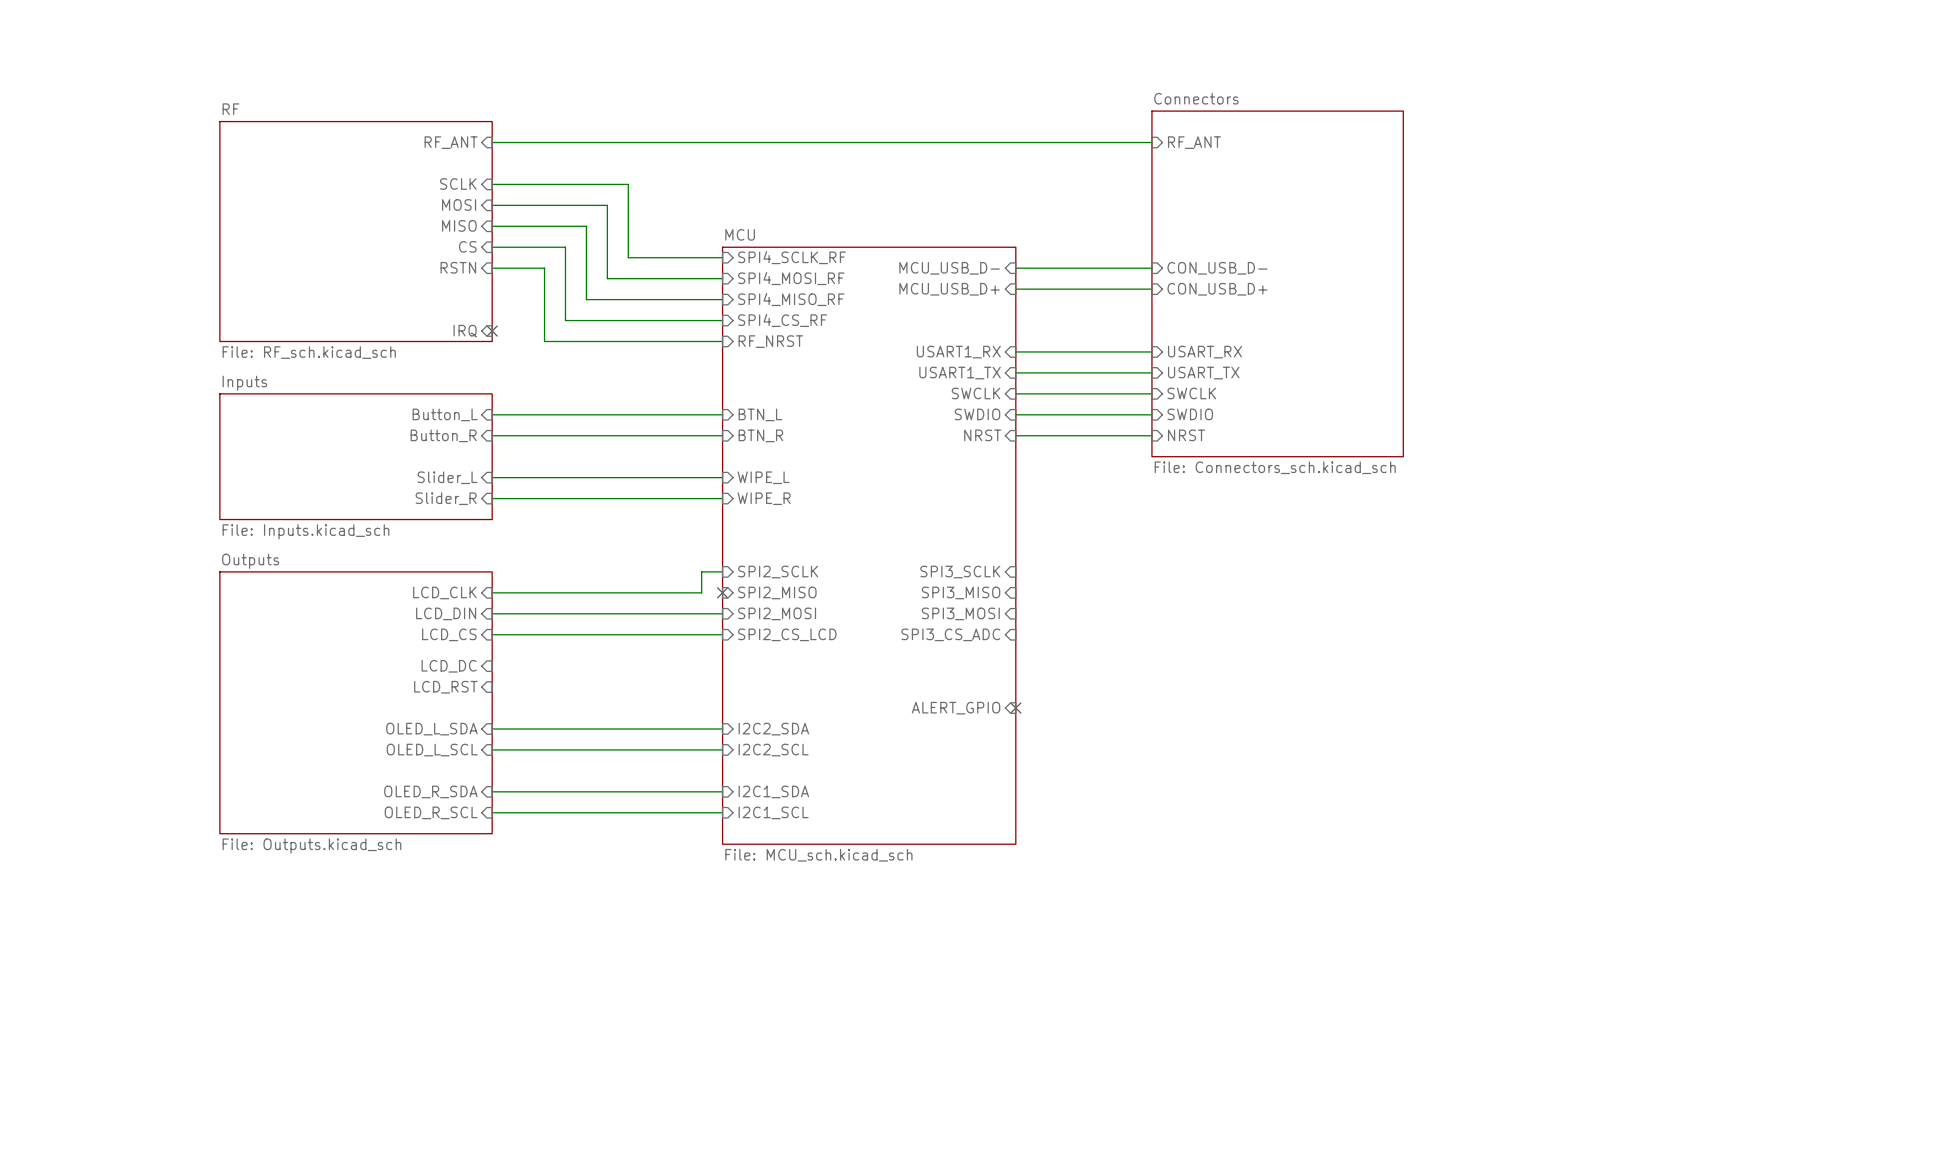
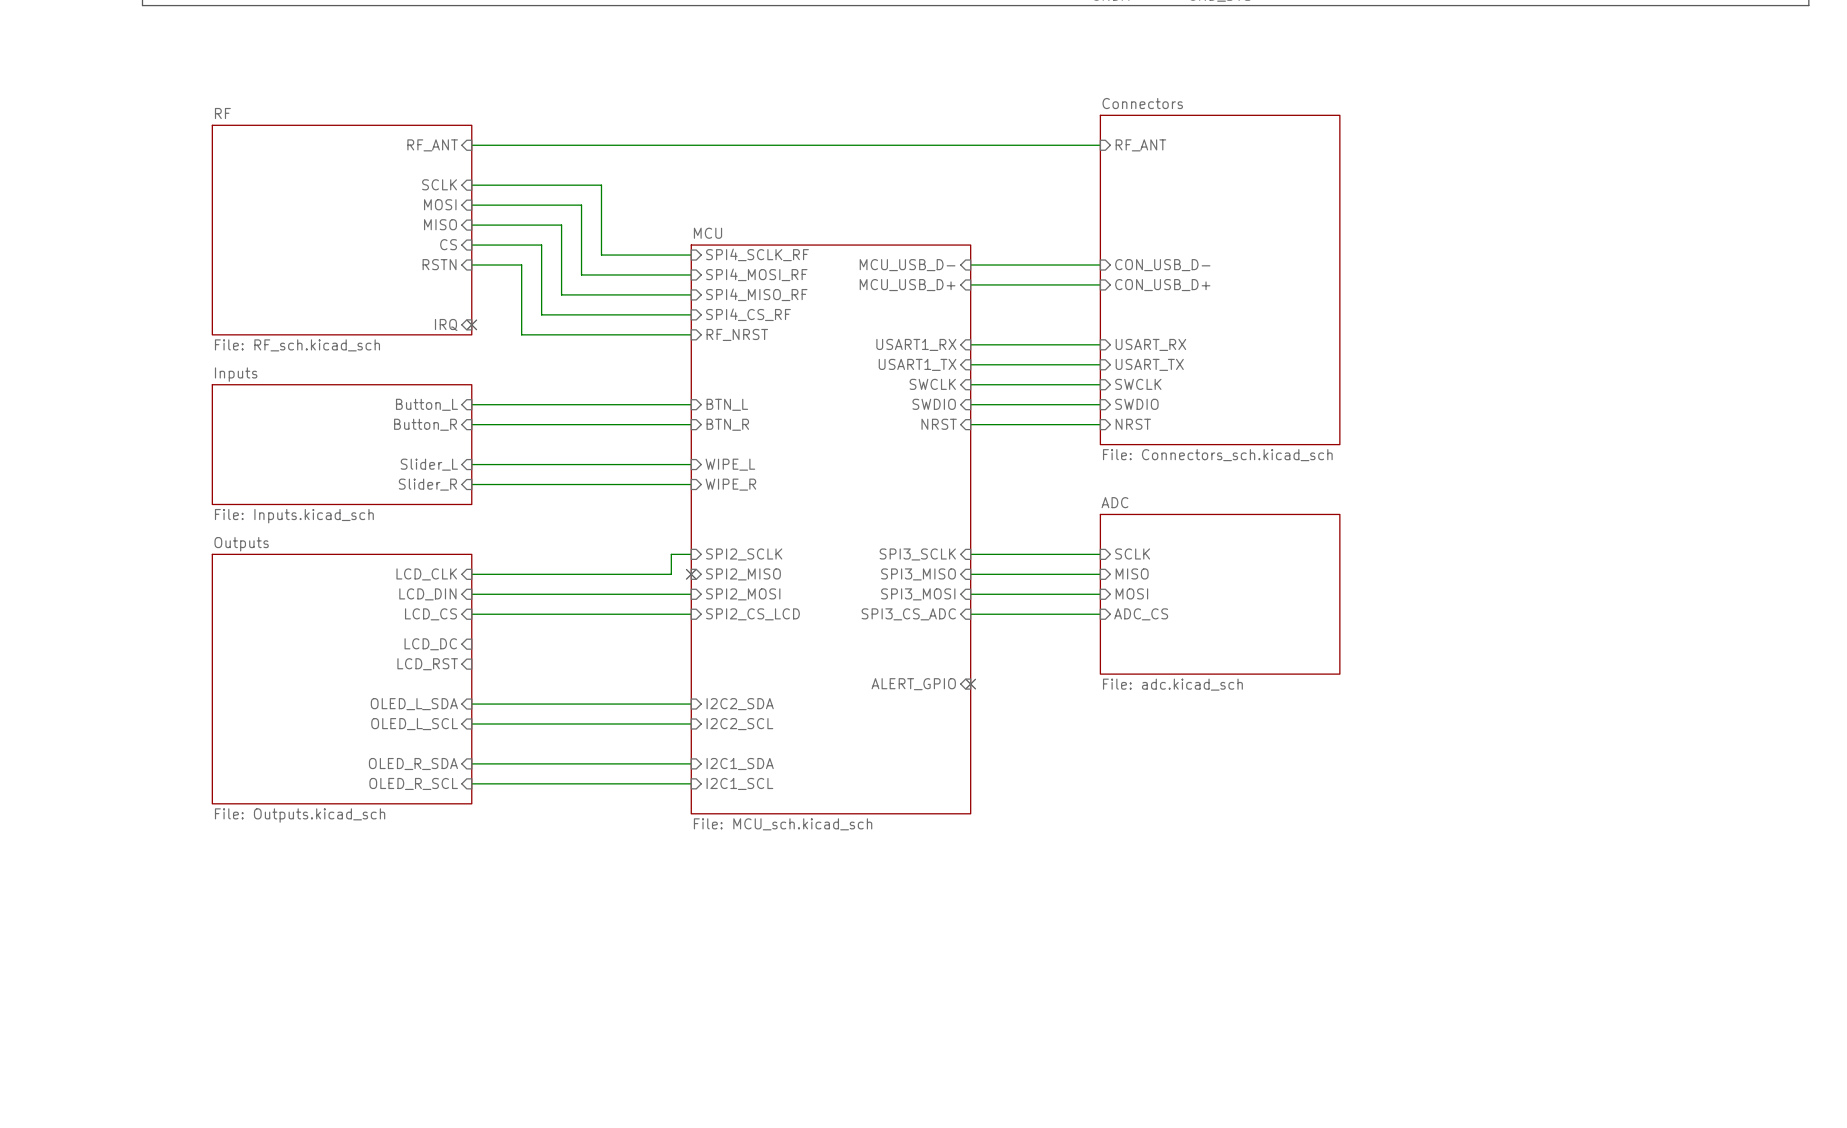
wire: none -> (970, 554) (1100, 554)
sheet pin: none -> SCLK (1132, 553)
wire: none -> (970, 574) (1100, 574)
sheet pin: none -> MISO (1132, 573)
wire: none -> (970, 594) (1100, 594)
sheet pin: none -> MOSI (1131, 593)
sheet ADC: none -> File: adc.kicad_sch (1220, 594)
wire: none -> (970, 614) (1100, 614)
sheet pin: none -> ADC_CS (1141, 614)

